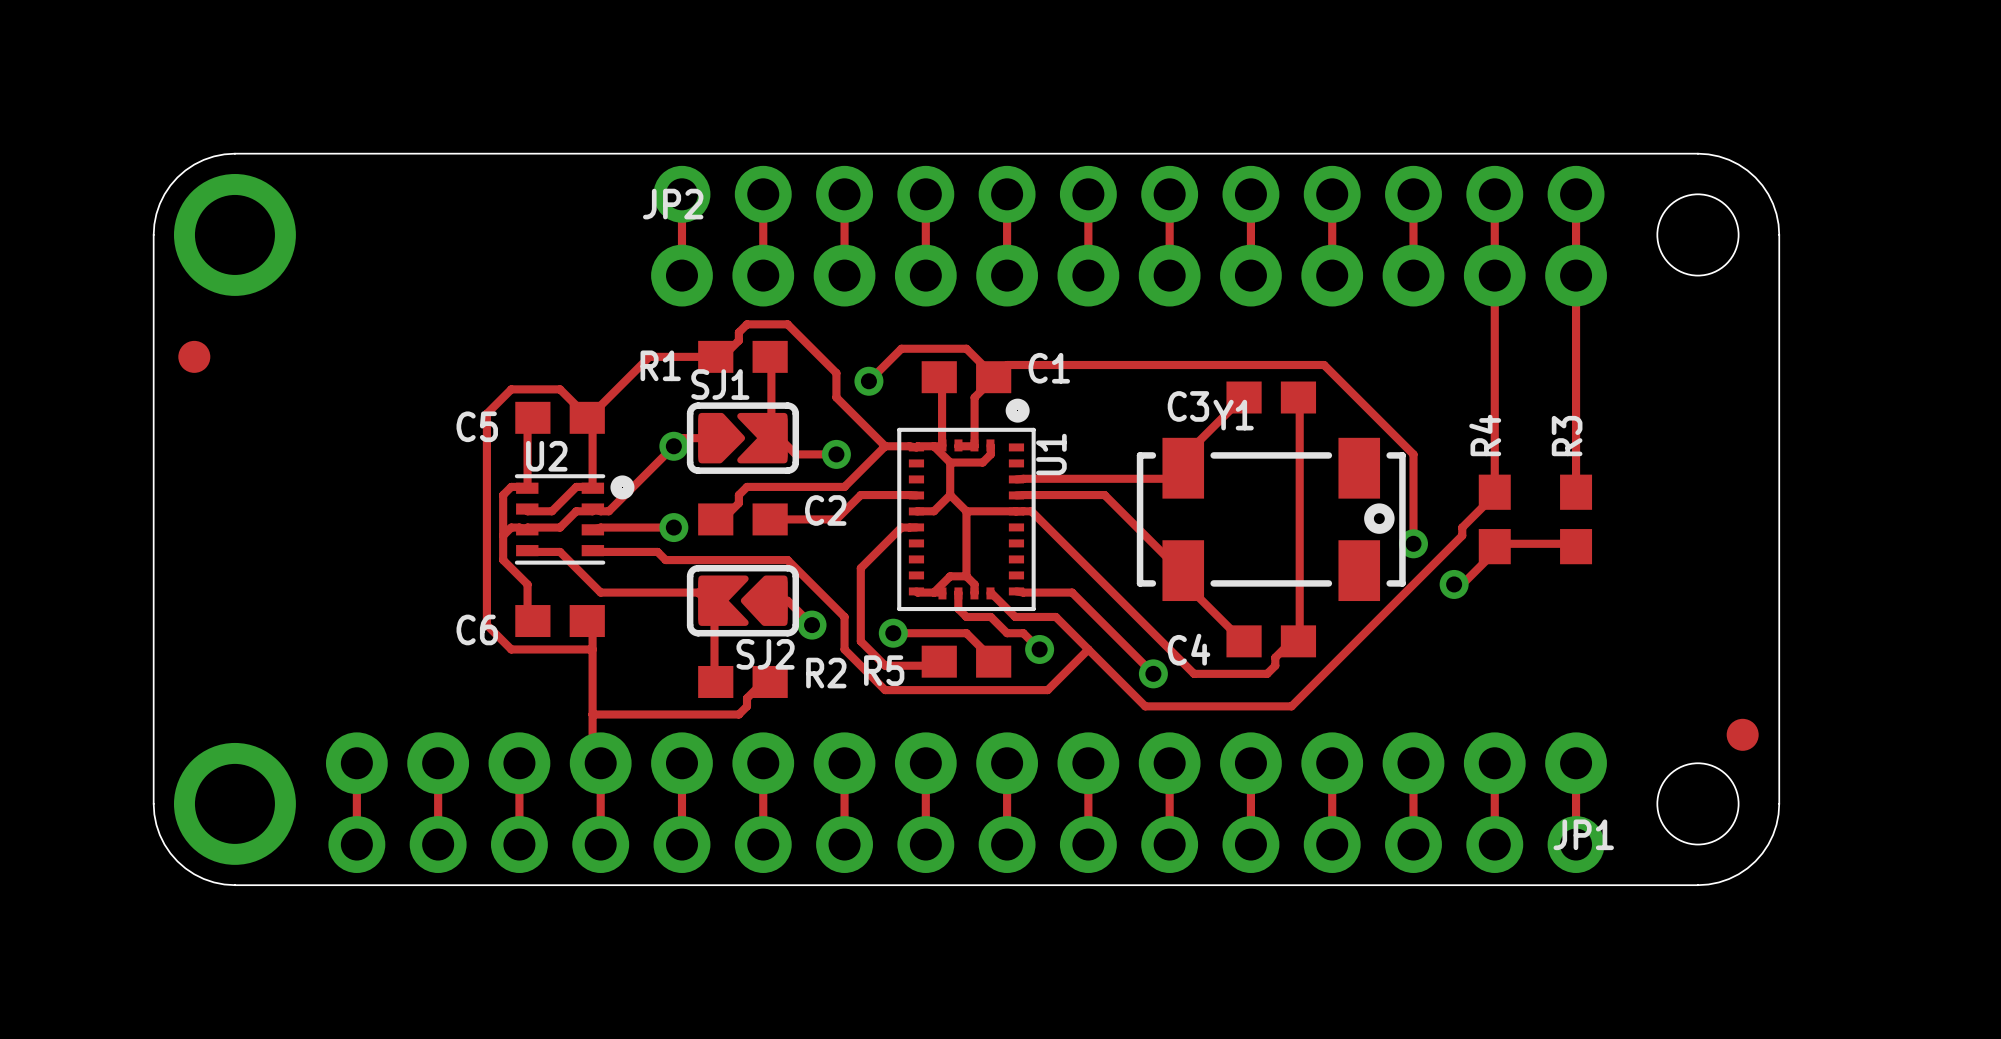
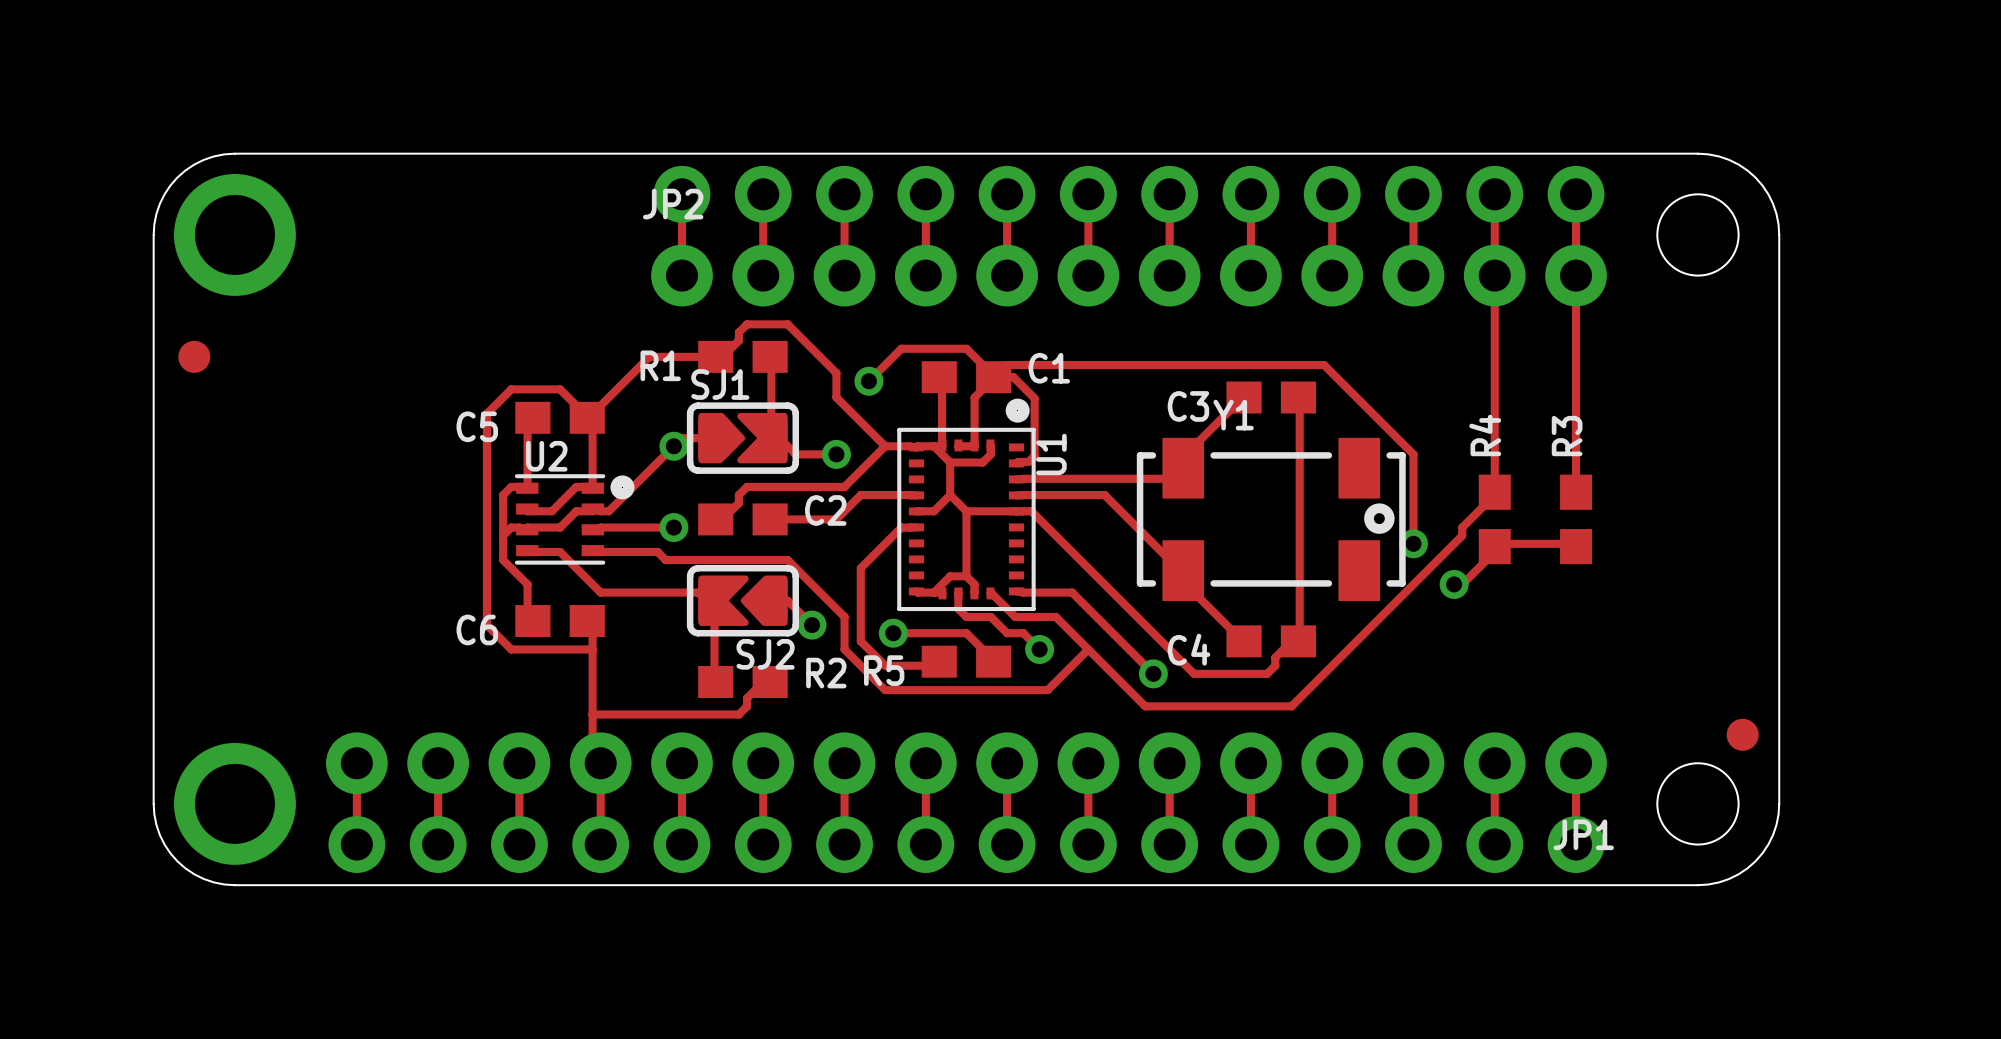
track: none -> (993, 377) (1013, 377) (1034, 398) (1034, 455) (1028, 461) (1016, 463)

